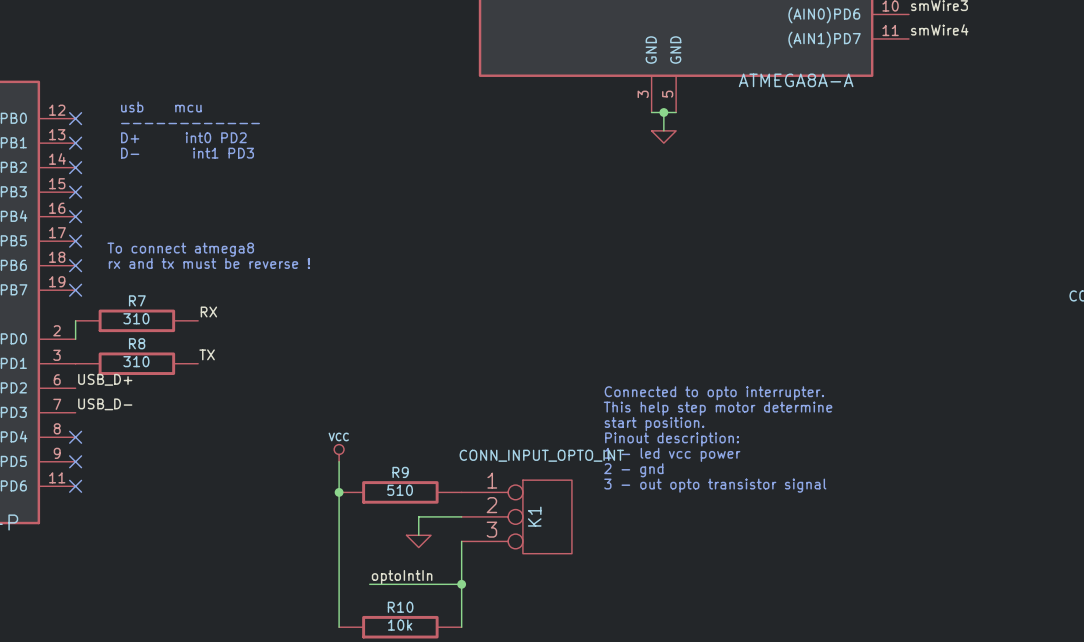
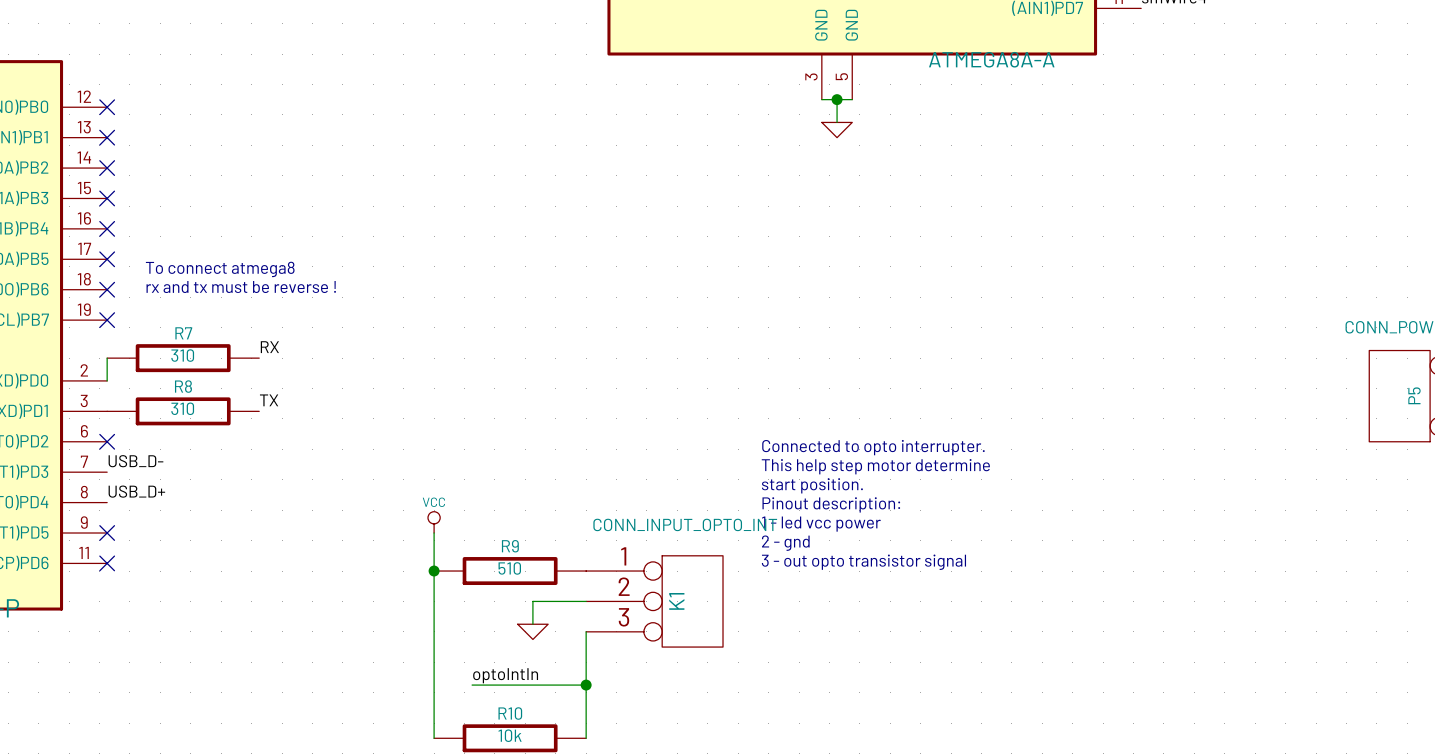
text: usb mcu (161, 106) -> none
text: ------------ (190, 123) -> none
text: D+ int0 PD2 (183, 137) -> none
text: D- int1 PD3 (187, 153) -> none
label position: USB_D+ (105, 379) -> USB_D+ (136, 491)
no-connect mark position: (75, 437) -> (107, 441)

